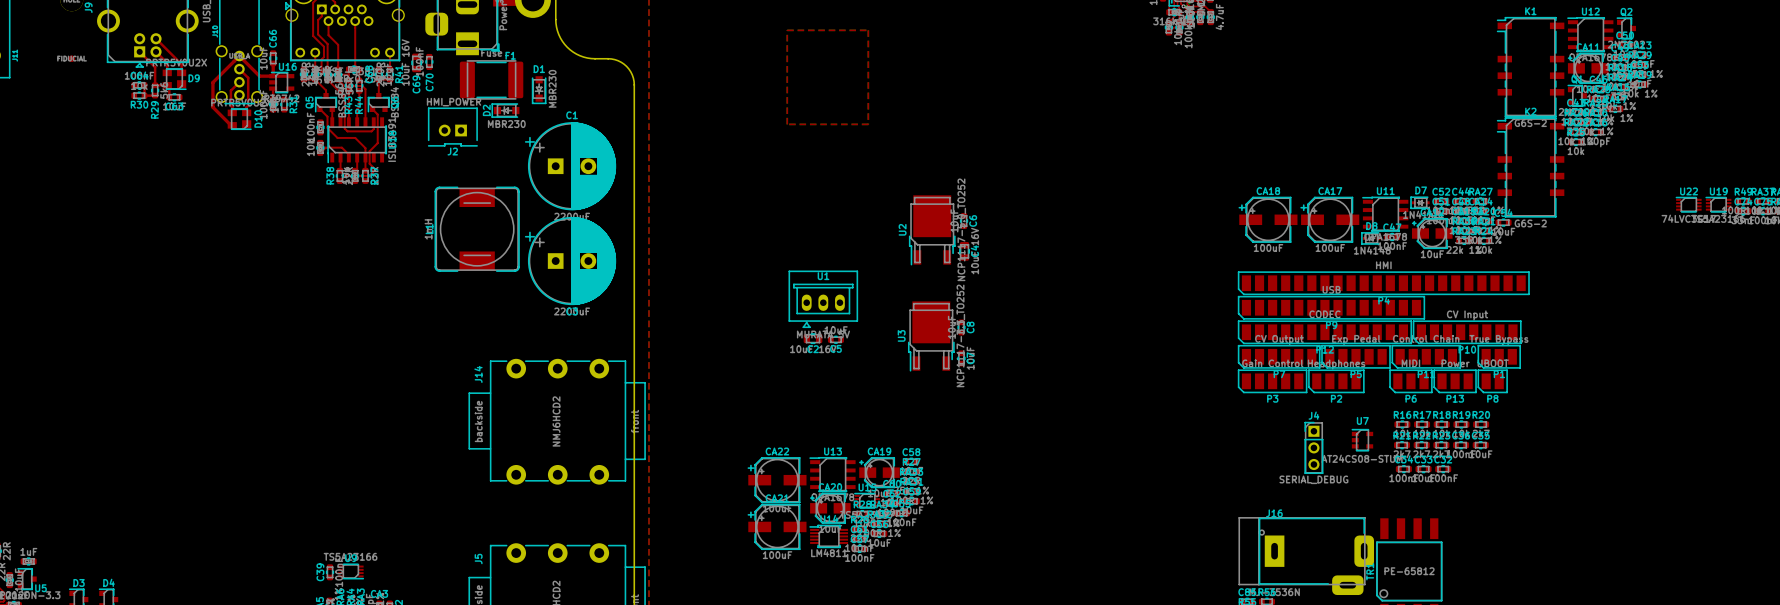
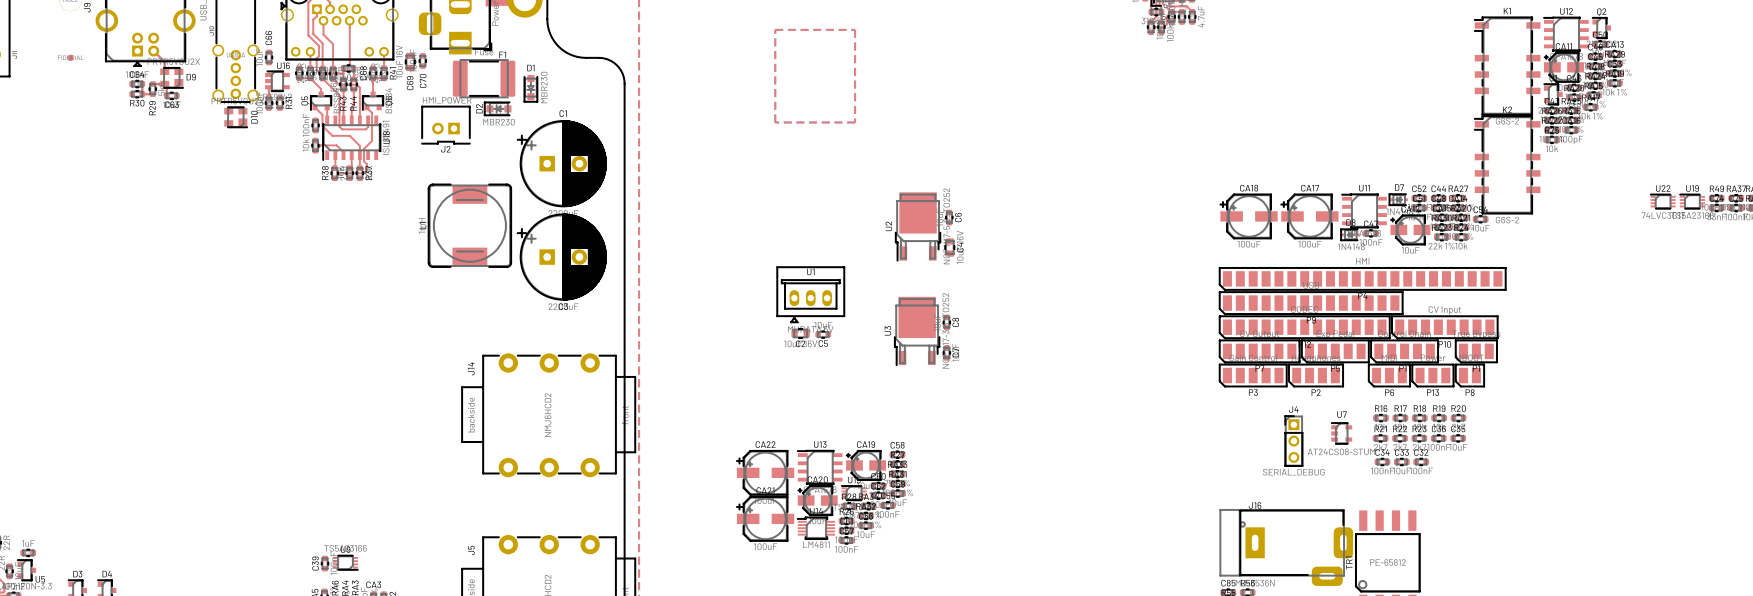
top track: (156, 38) (181, 64) (181, 72) -> none
top track: (139, 51) (155, 67) (155, 85) -> none
top track: (273, 63) (273, 76) -> none
top track: (239, 69) (248, 77) (246, 112) -> none
top track: (290, 76) (259, 76) (239, 56) (212, 82) (212, 107) (230, 125) (233, 125) -> none
top track: (239, 82) (230, 90) (232, 112) -> none

